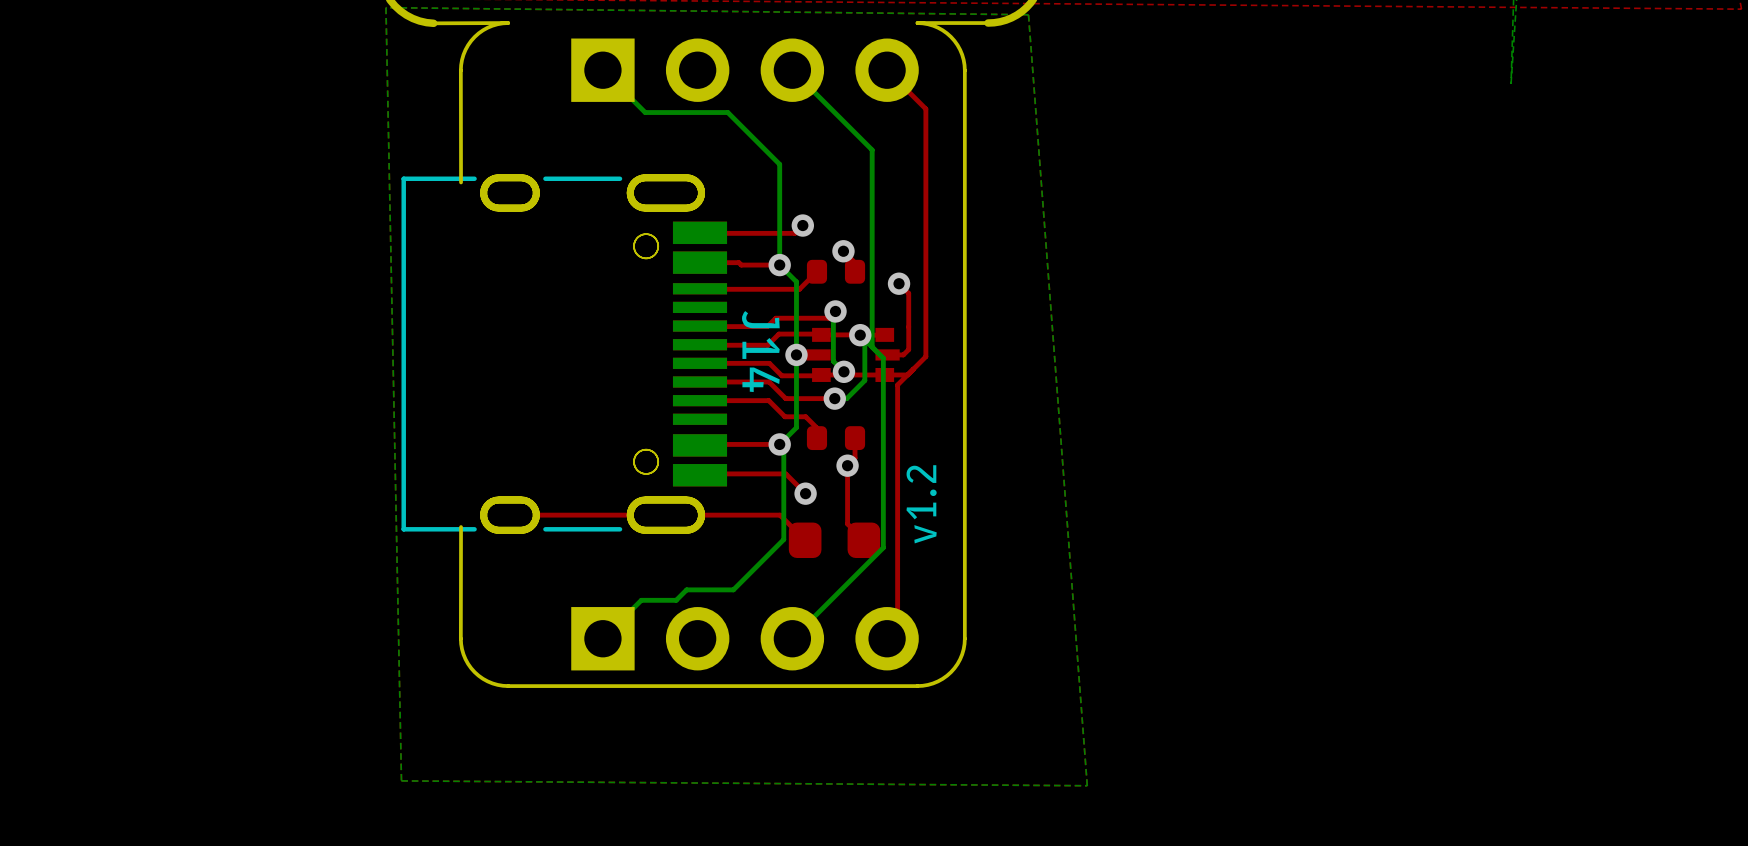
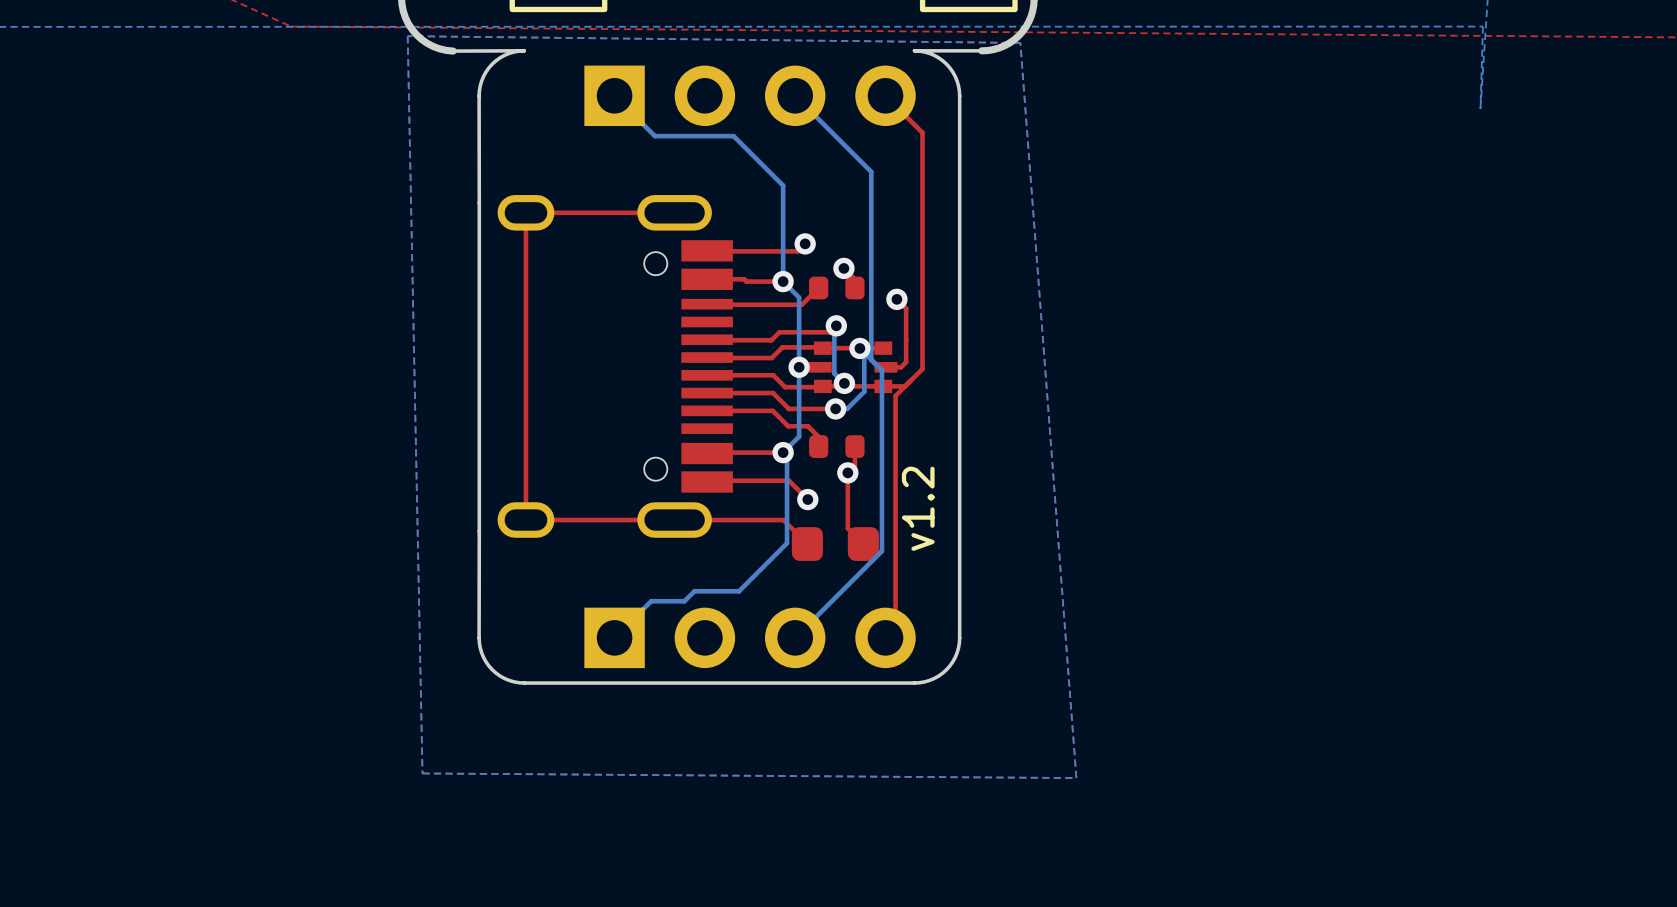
board edge: none -> (479, 202) (479, 531)
top track: none -> (674, 212) (525, 212) (525, 520)
J14: (564, 354) -> none

